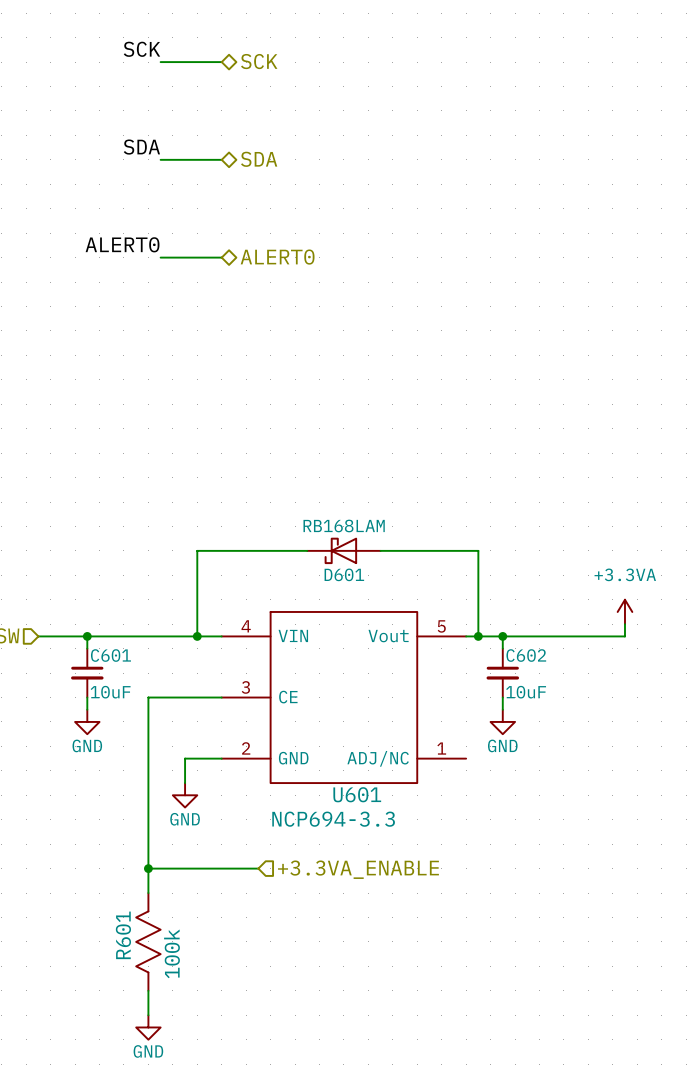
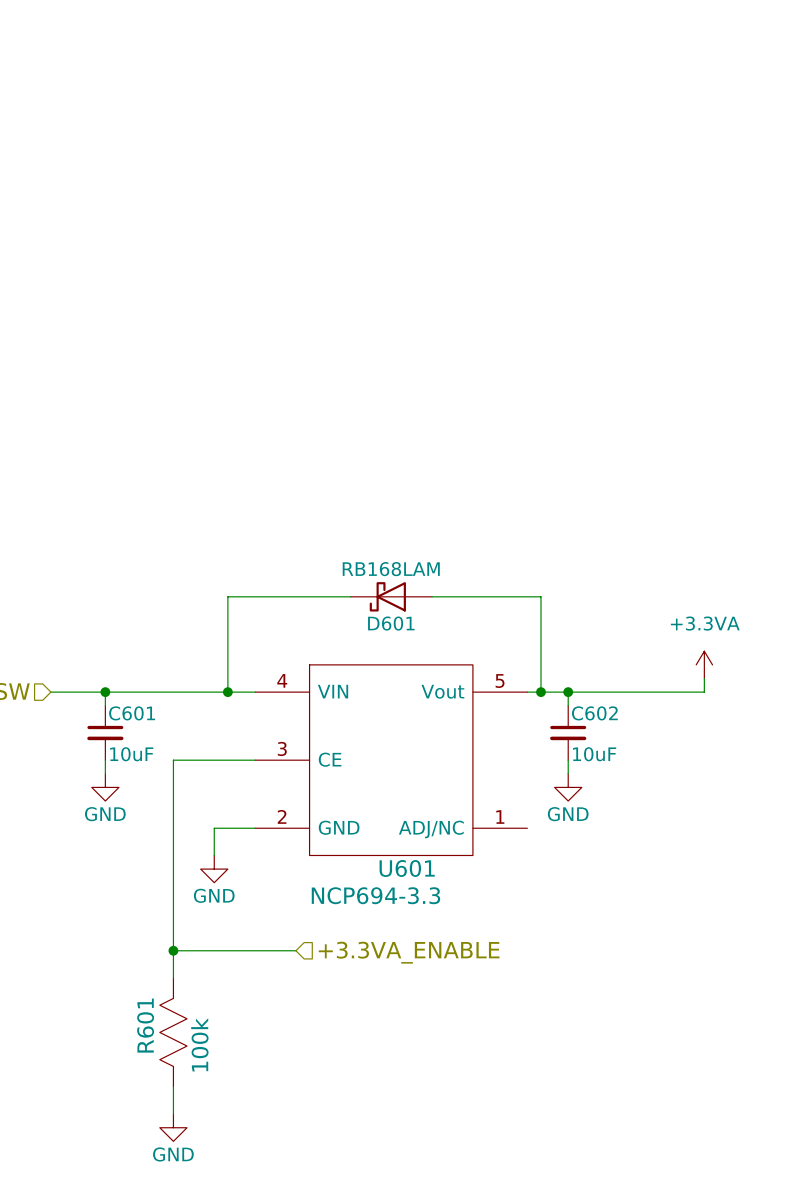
label: SCK (141, 49) -> none
hierarchical label: SCK (259, 61) -> none
wire: (160, 62) (221, 62) -> none
label: SDA (141, 147) -> none
wire: (160, 159) (221, 159) -> none
hierarchical label: SDA (259, 159) -> none
label: ALERT0 (122, 244) -> none
wire: (160, 257) (221, 257) -> none
hierarchical label: ALERT0 (277, 257) -> none

